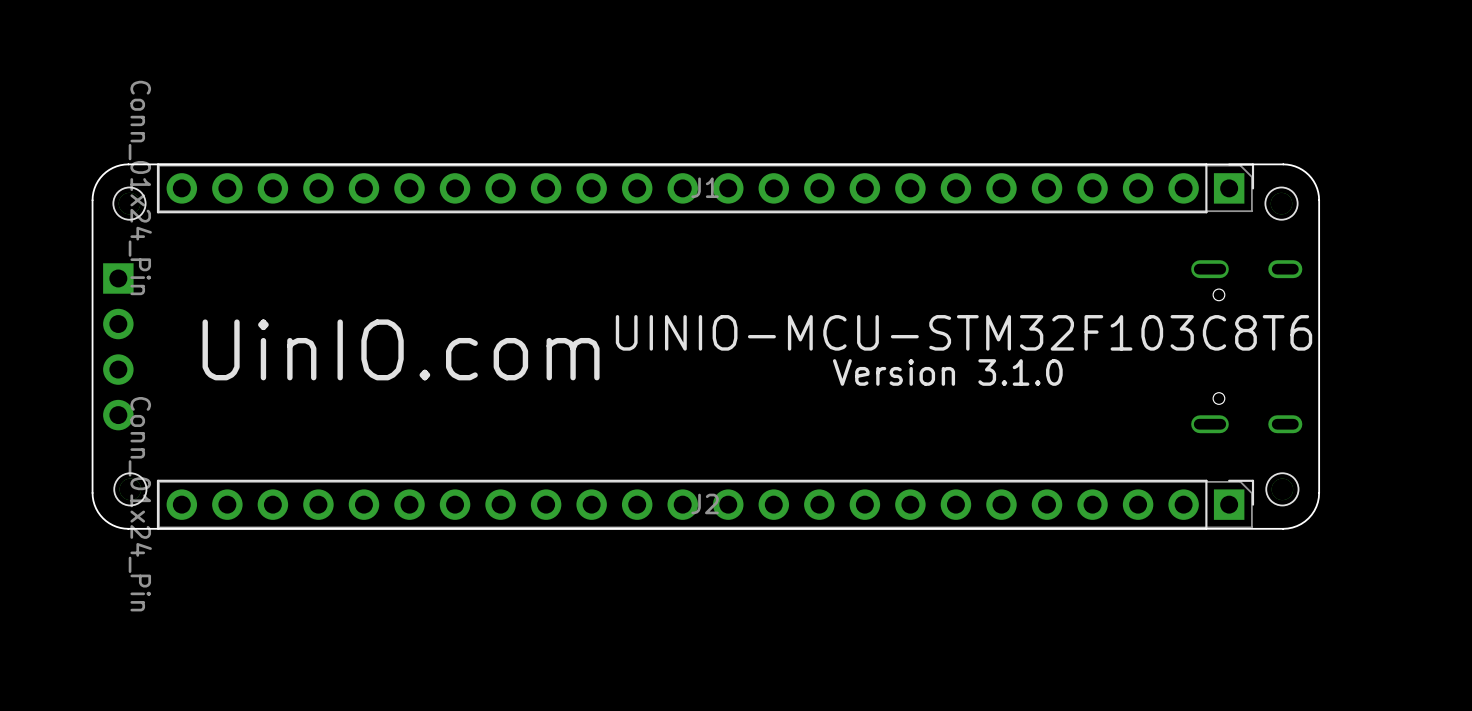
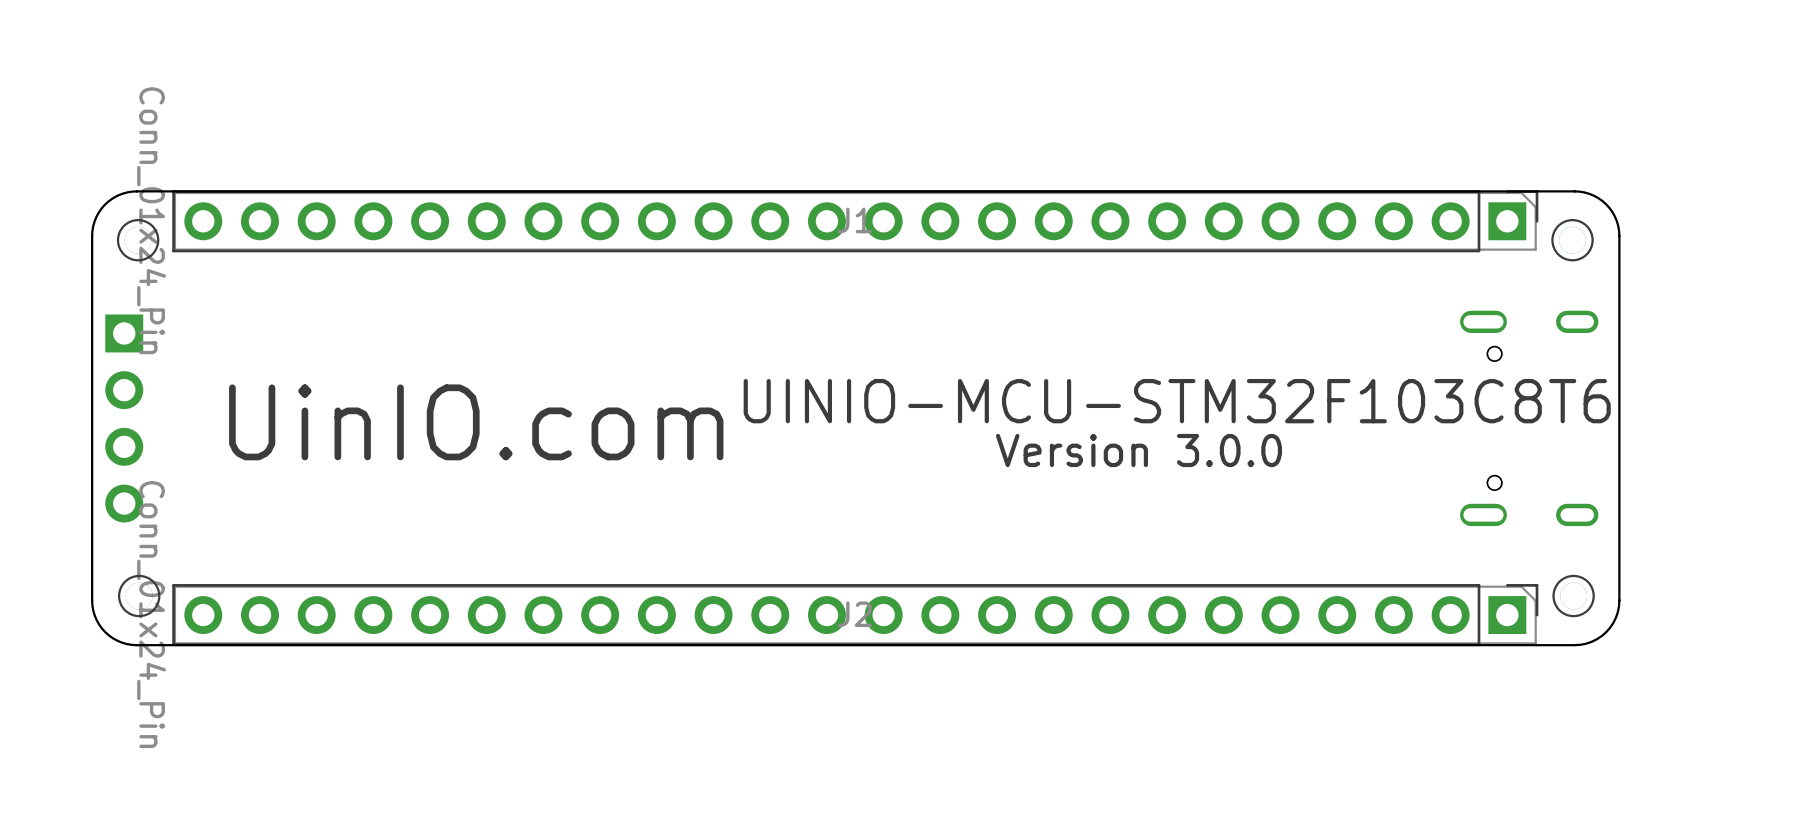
text: Version 3.1.0 (947, 372) -> Version 3.0.0 (1138, 450)

